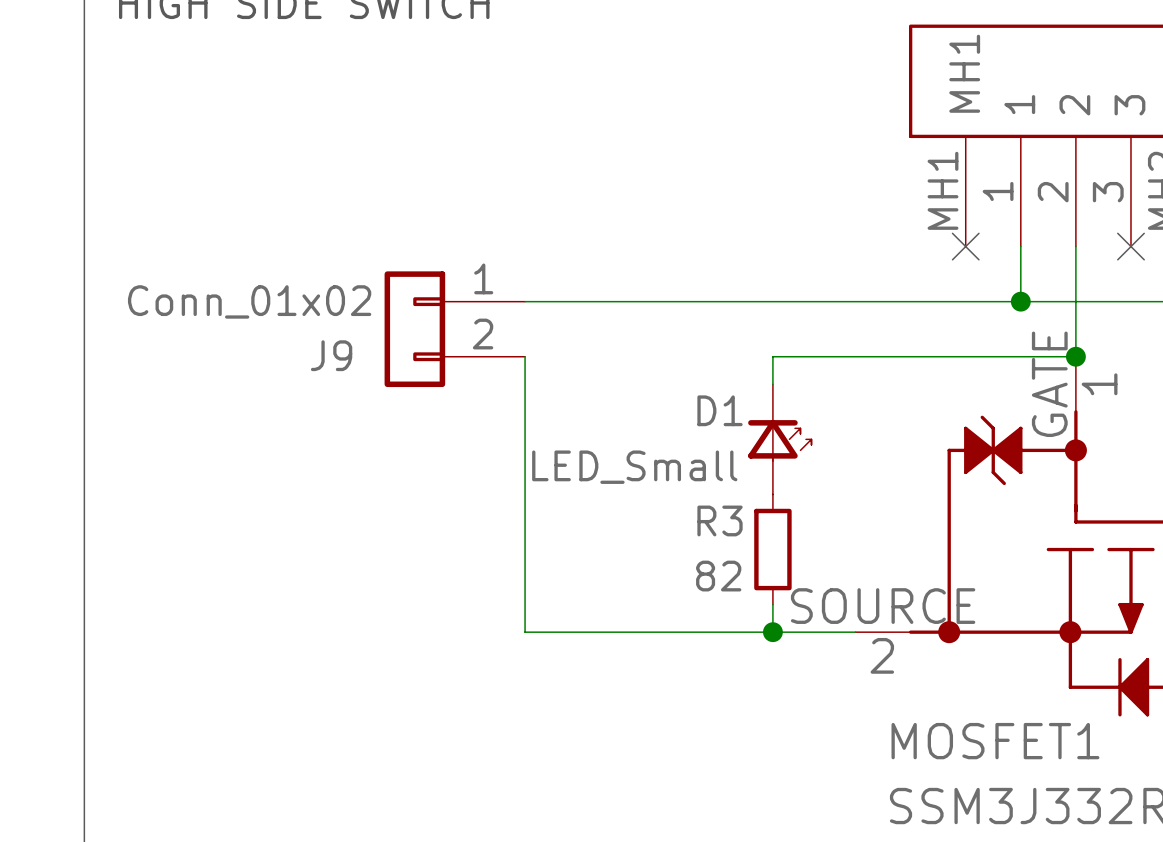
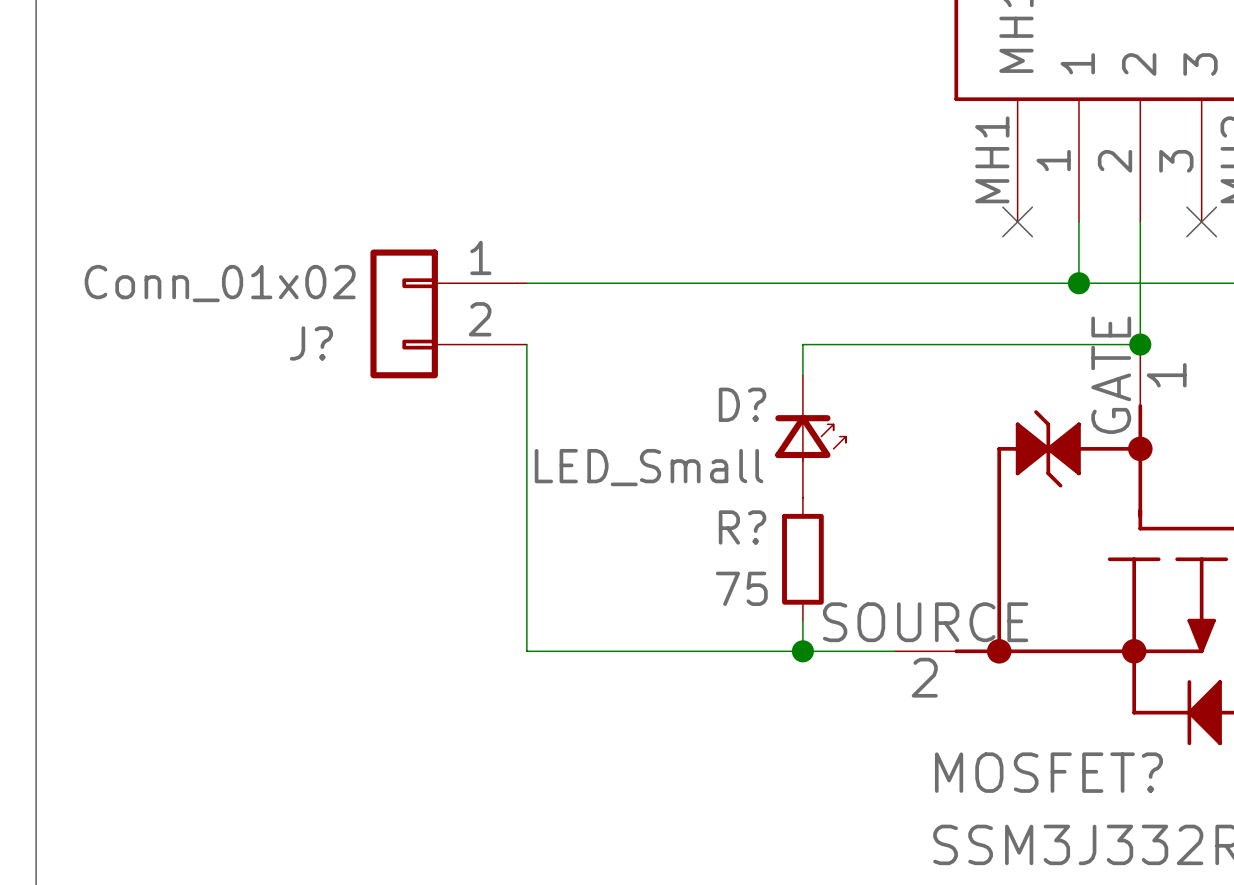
J9 name: J9 (331, 355) -> J? (311, 343)
D1 name: D1 (720, 410) -> D? (742, 404)
R3 name: R3 (720, 520) -> R? (742, 527)
R3 value: 82 (718, 576) -> 75 (741, 588)
MOSFET1 name: MOSFET1 (995, 741) -> MOSFET? (1048, 772)

